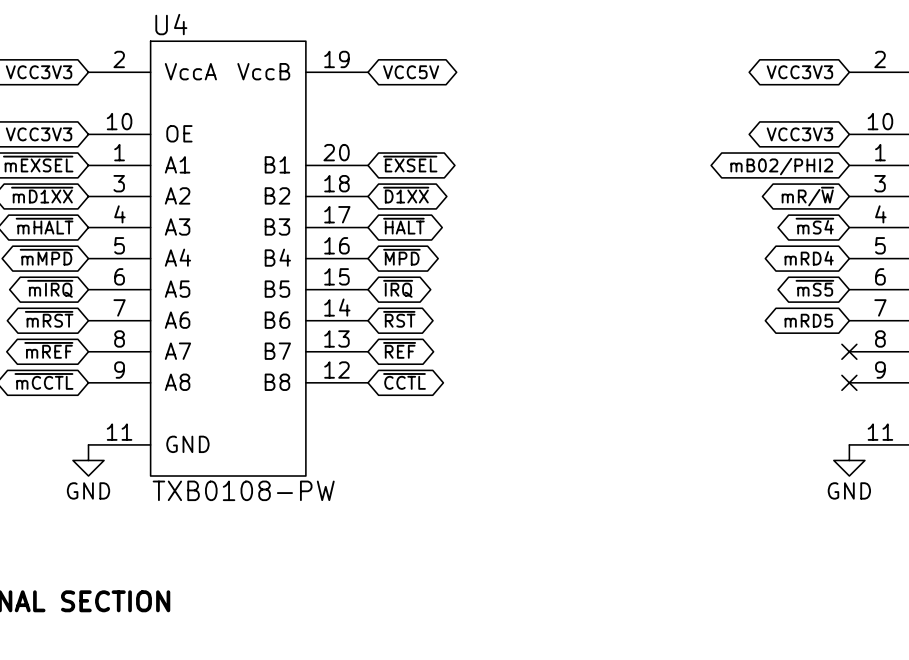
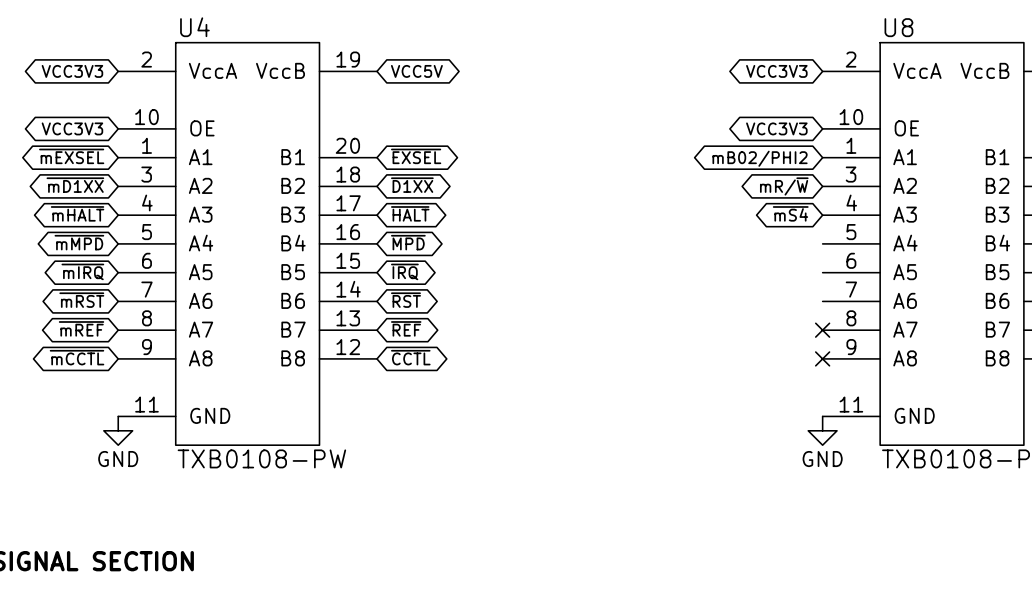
global label: mRD4 (809, 258) -> none
global label: ~{mS5} (814, 288) -> none
global label: mRD5 (808, 320) -> none

